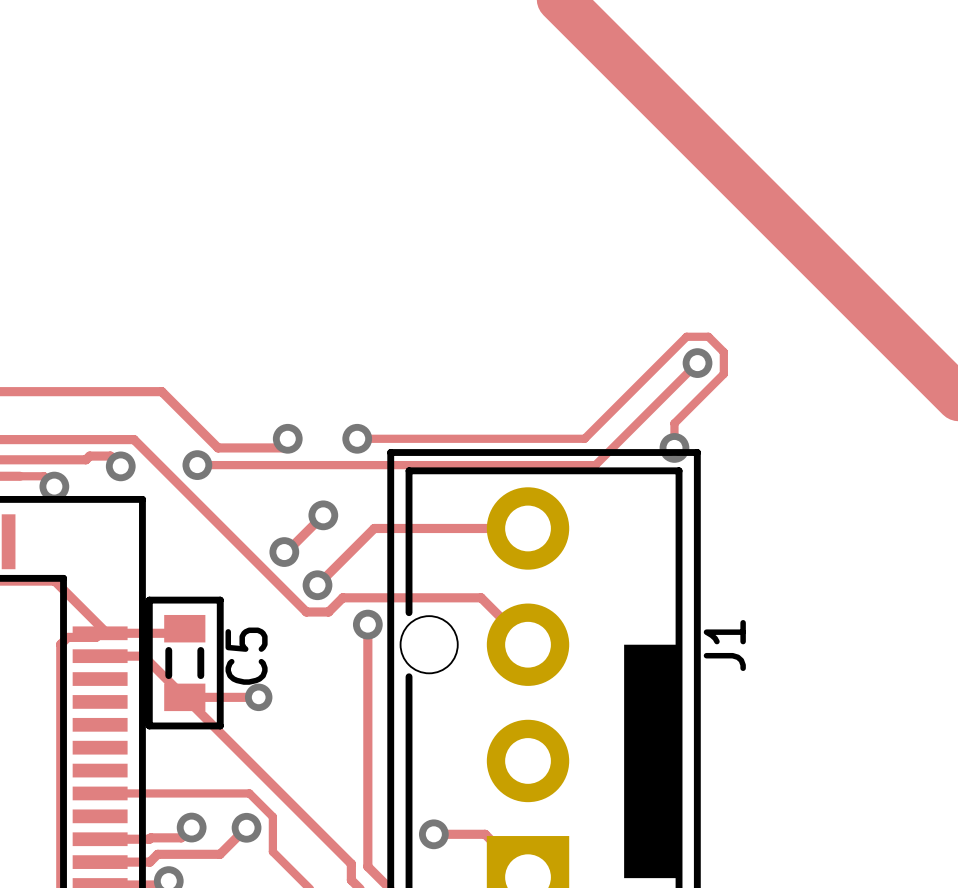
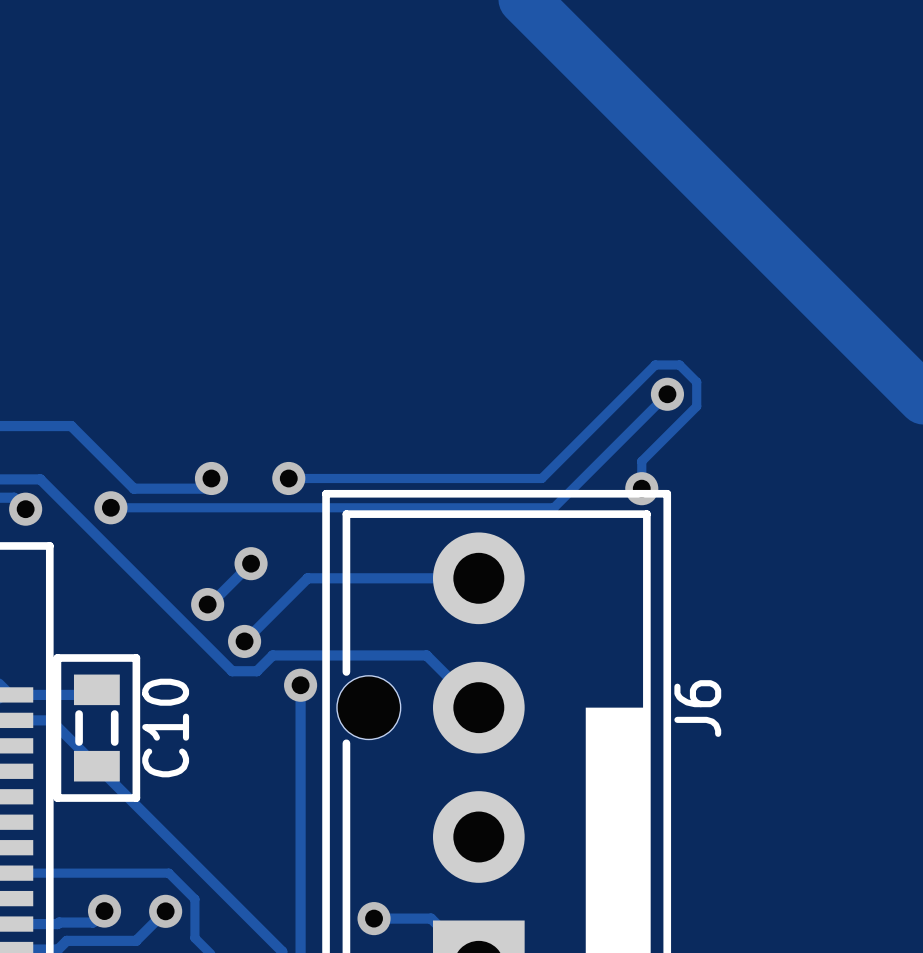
J1 name: J1 (724, 645) -> J6 (697, 708)
C5 name: C5 (246, 656) -> C10 (165, 728)
track: (184, 697) (258, 697) -> none
via: (258, 697) -> none

